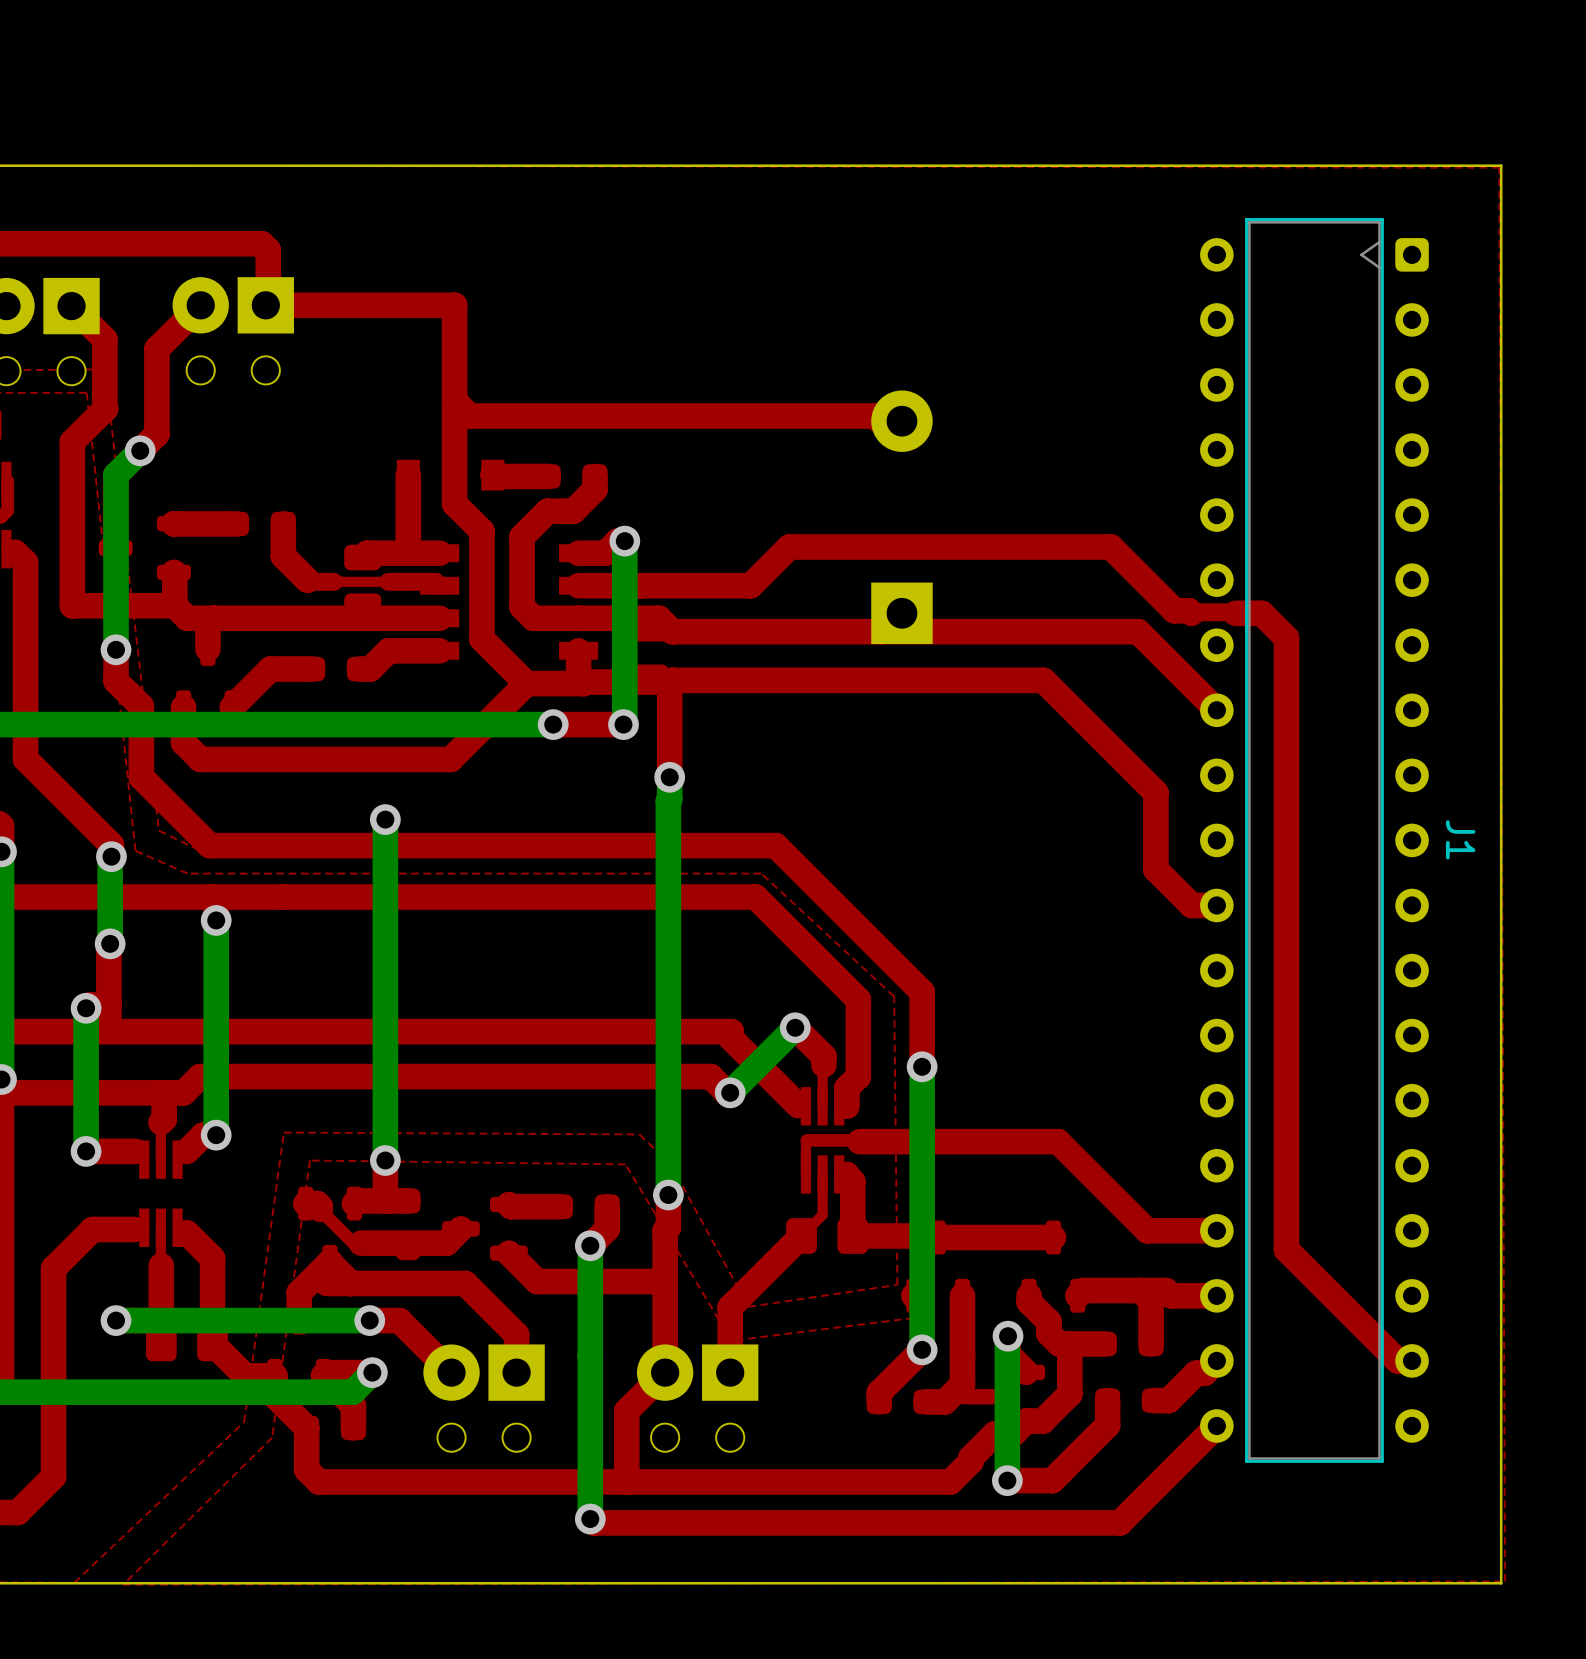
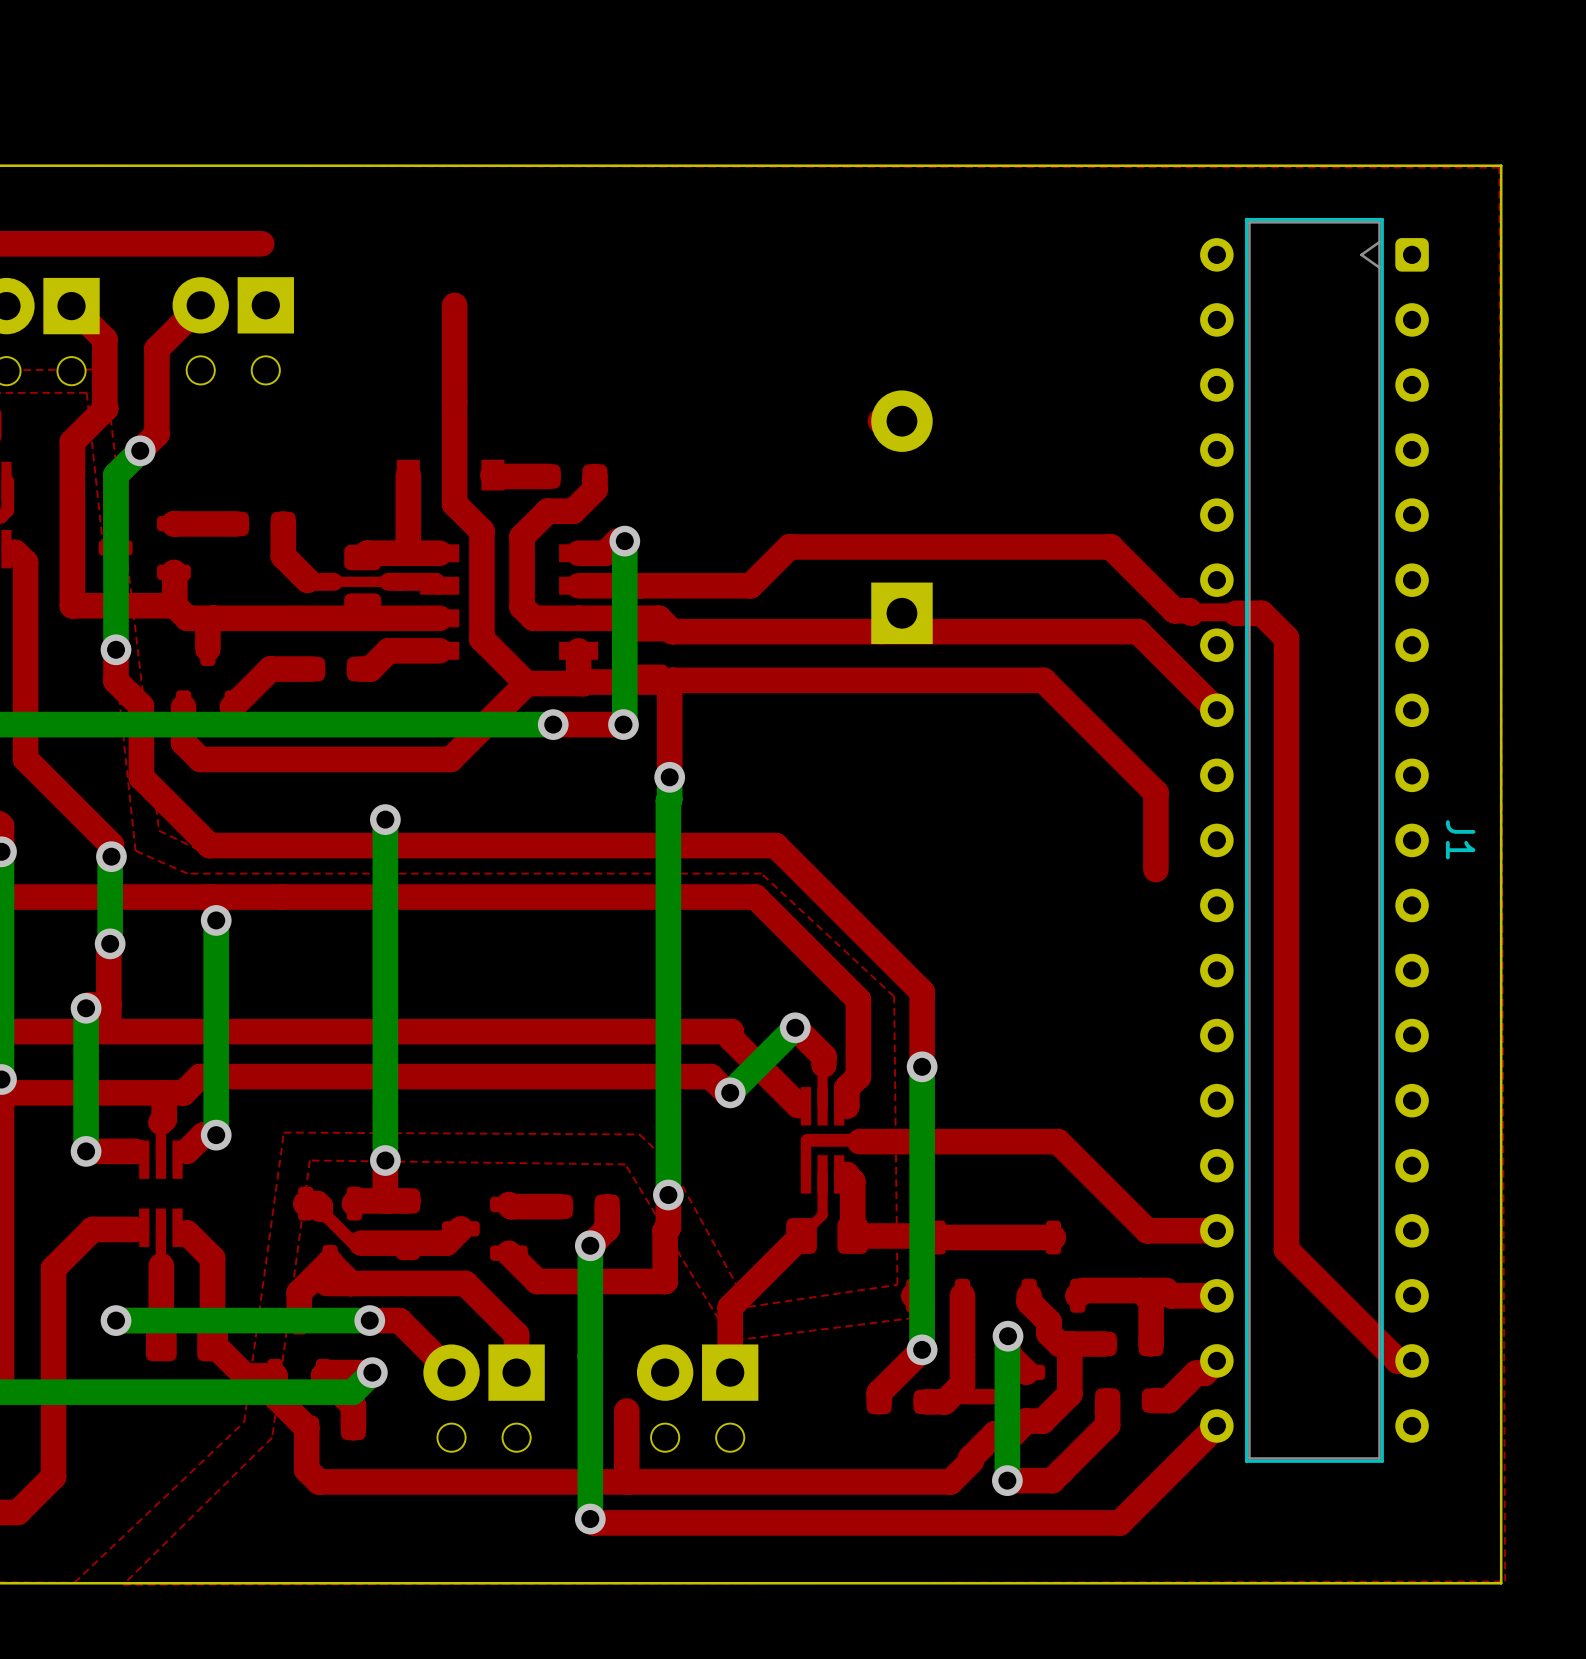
top track: (261, 243) (268, 250) (268, 302) (265, 305) (454, 305) -> none
top track: (454, 400) (469, 416) (875, 416) (880, 421) -> none
top track: (1155, 869) (1191, 905) (1216, 905) -> none
top track: (665, 1281) (665, 1372) (626, 1411) -> none

